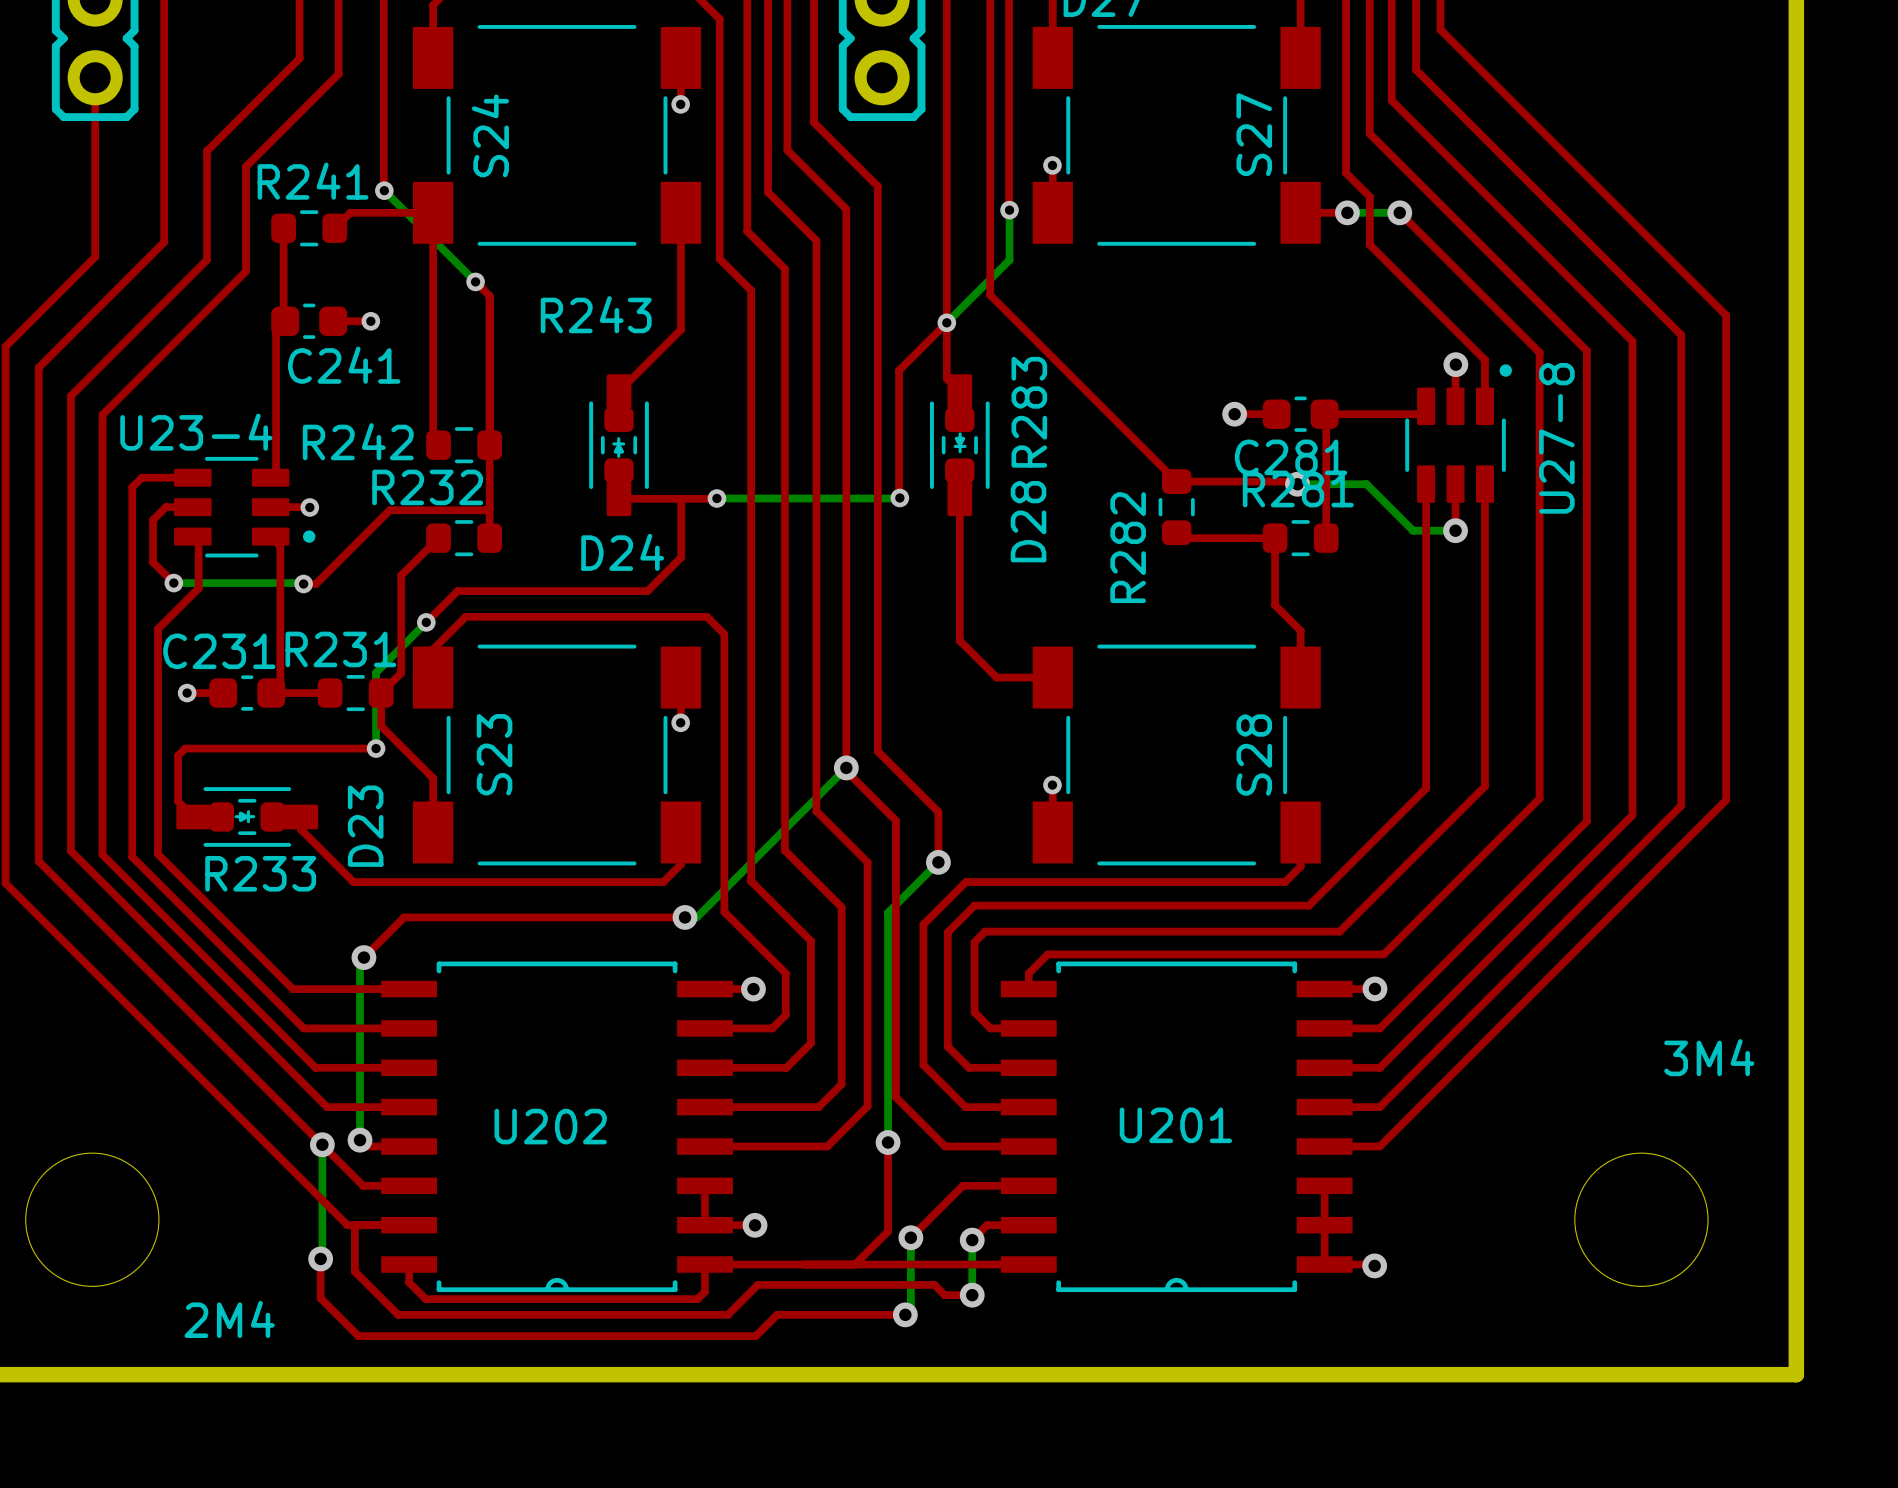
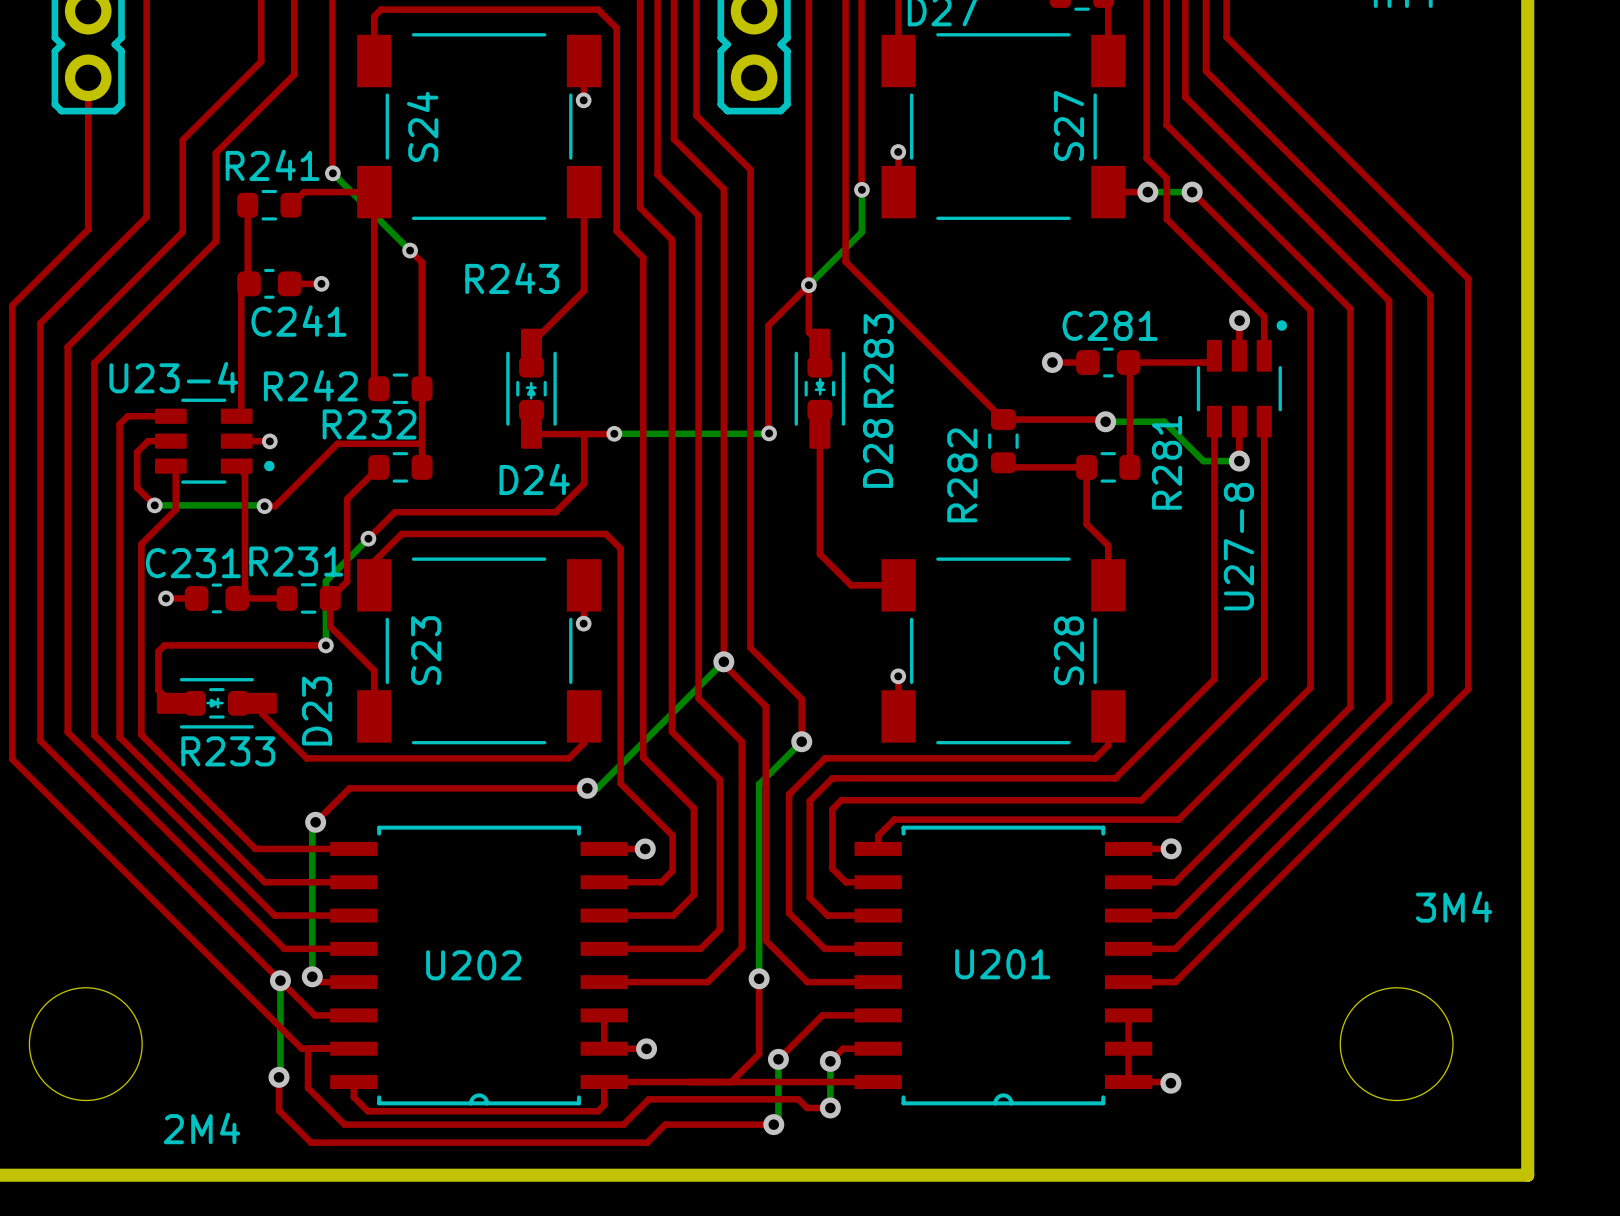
U27-8 name position: U27-8 (1556, 438) -> U27-8 (1238, 546)
C281 name position: C281 (1291, 457) -> C281 (1110, 325)
R281 name rotation: 0° (1298, 489) -> 90° counterclockwise (1167, 462)

